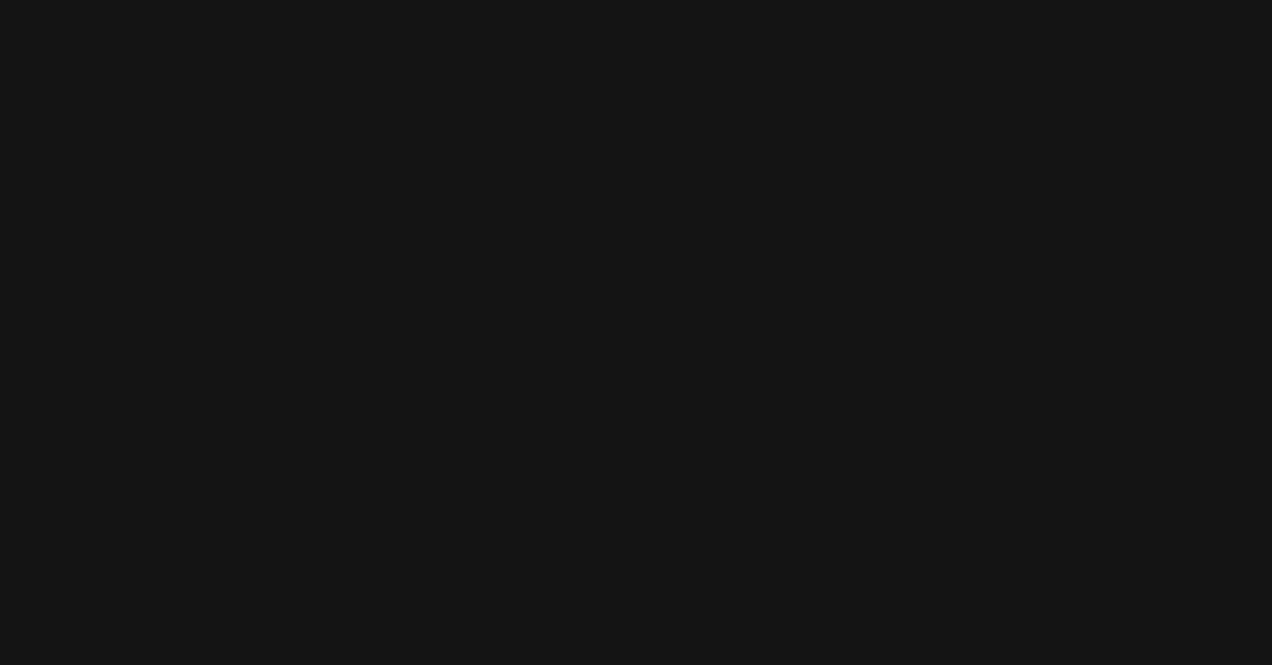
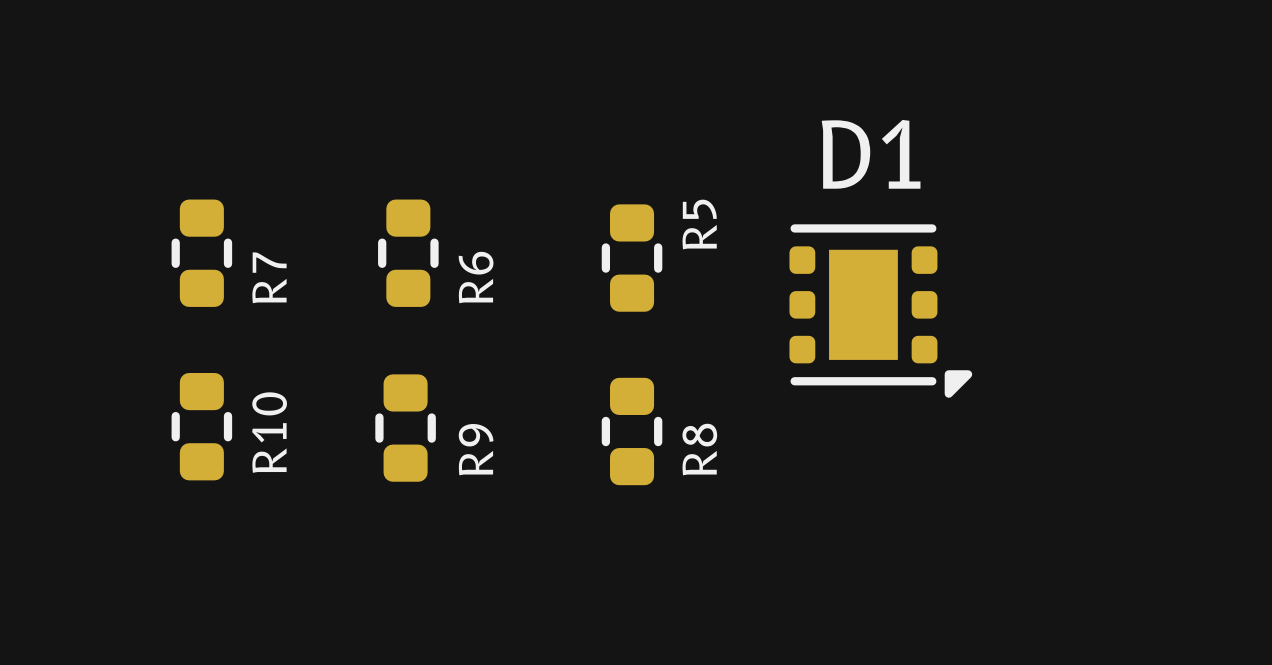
part: none -> R7 (201, 253)
part: none -> R6 (408, 253)
part: none -> R5 (632, 258)
part: none -> D1 (880, 311)
part: none -> R10 (201, 426)
part: none -> R9 (405, 428)
part: none -> R8 (632, 431)

